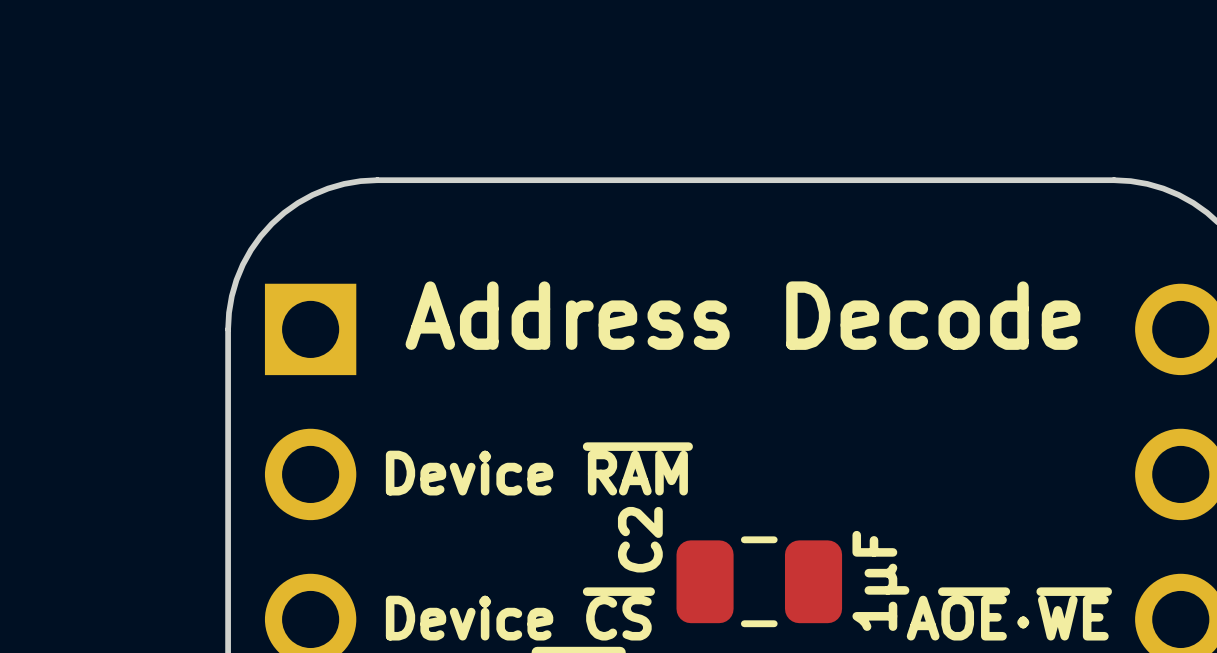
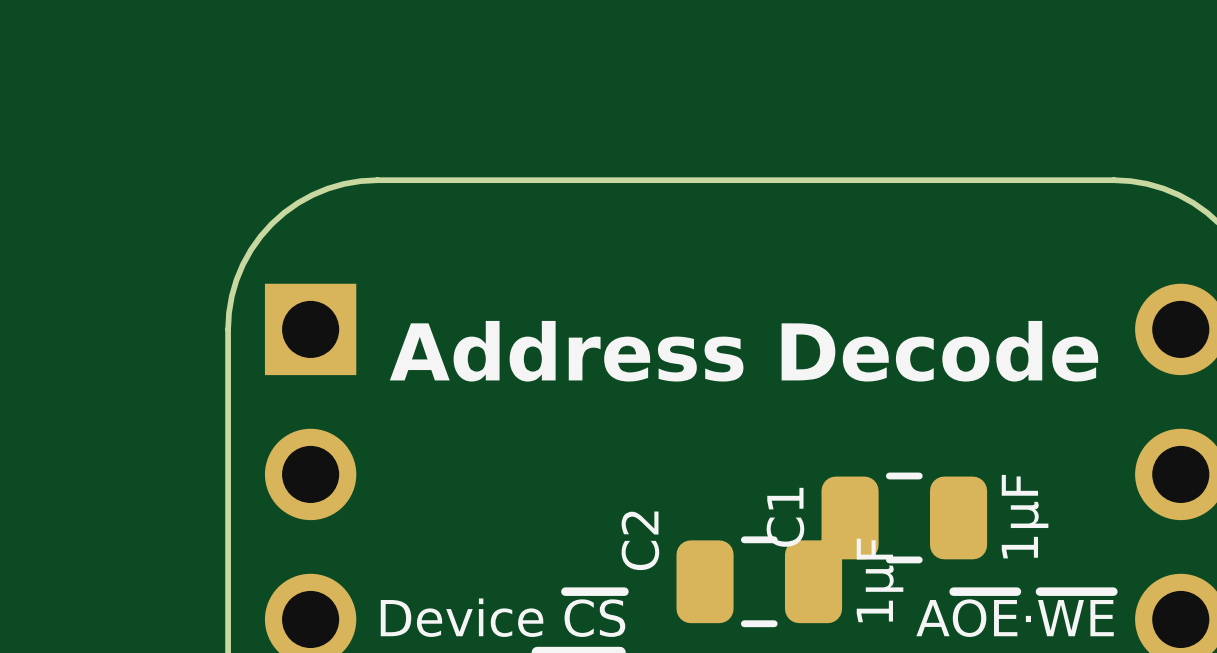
text position: Address Decode (742, 315) -> Address Decode (743, 351)
text: Device ~{RAM} (539, 468) -> none
C1: none -> 1μF (904, 517)

